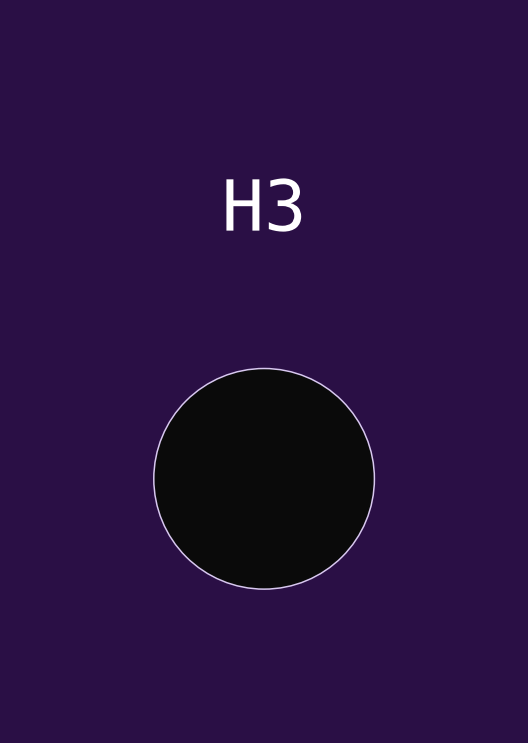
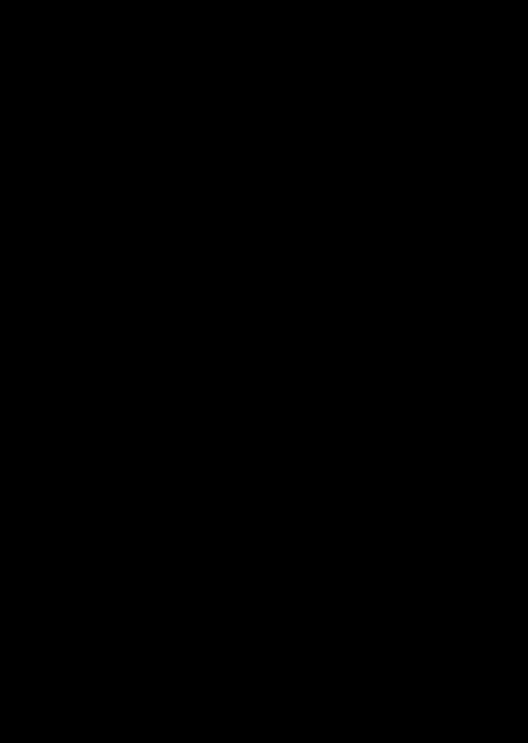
H3: (264, 478) -> none

